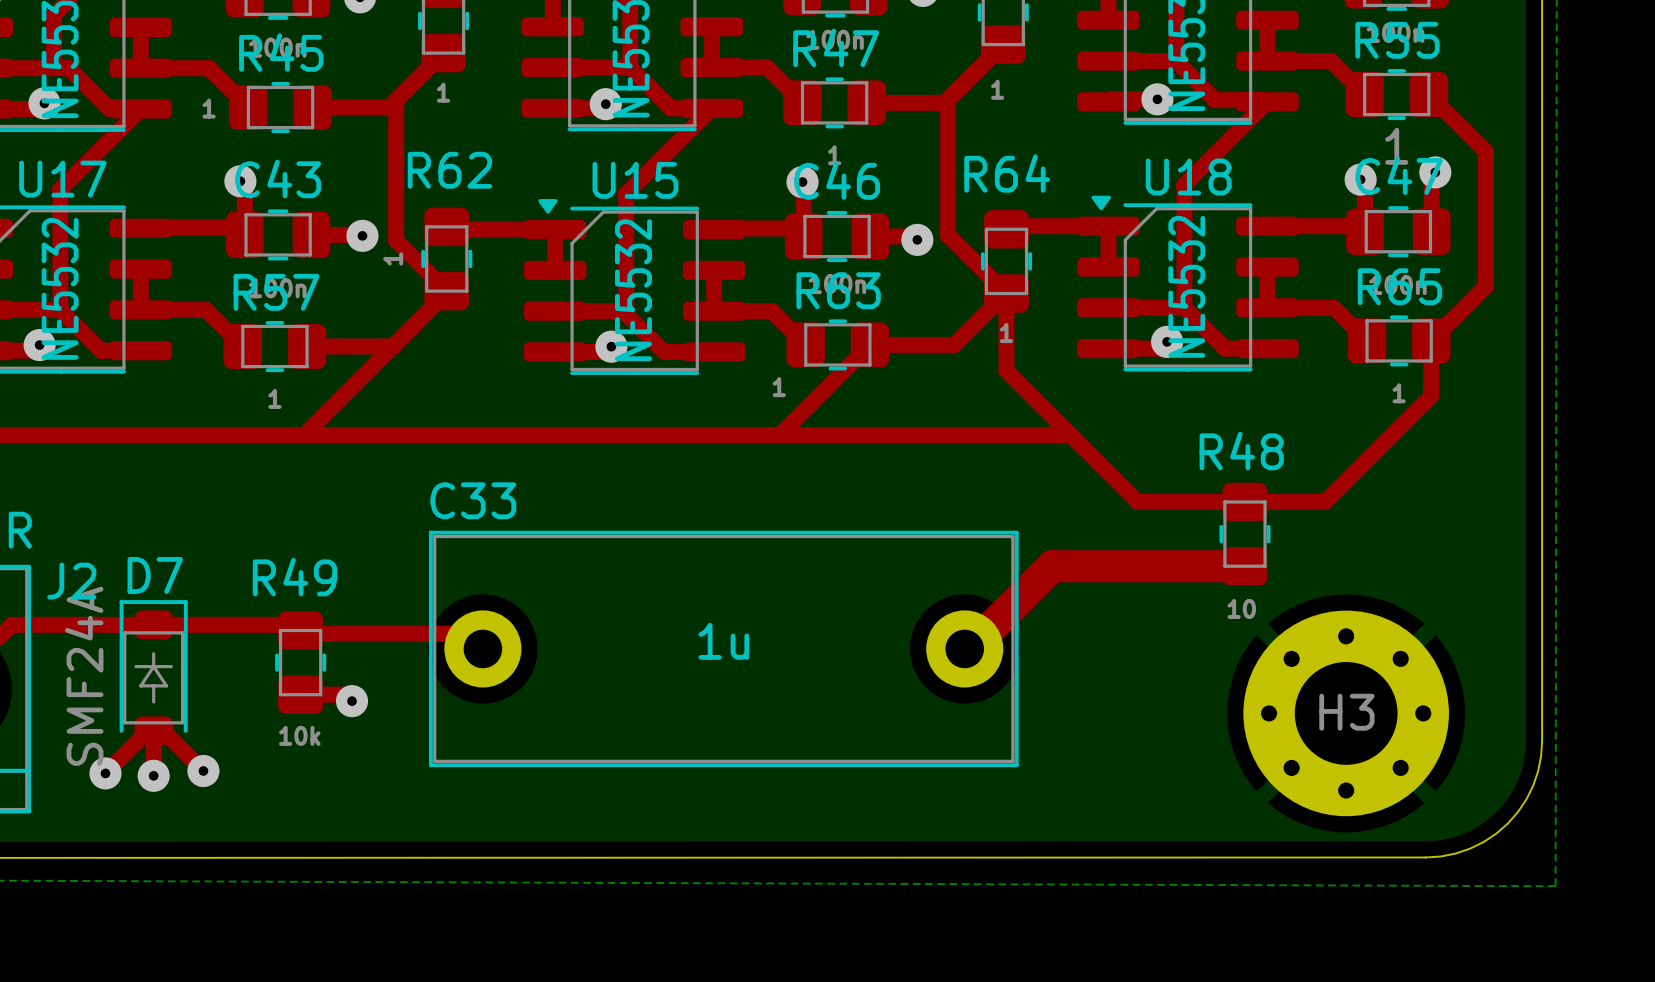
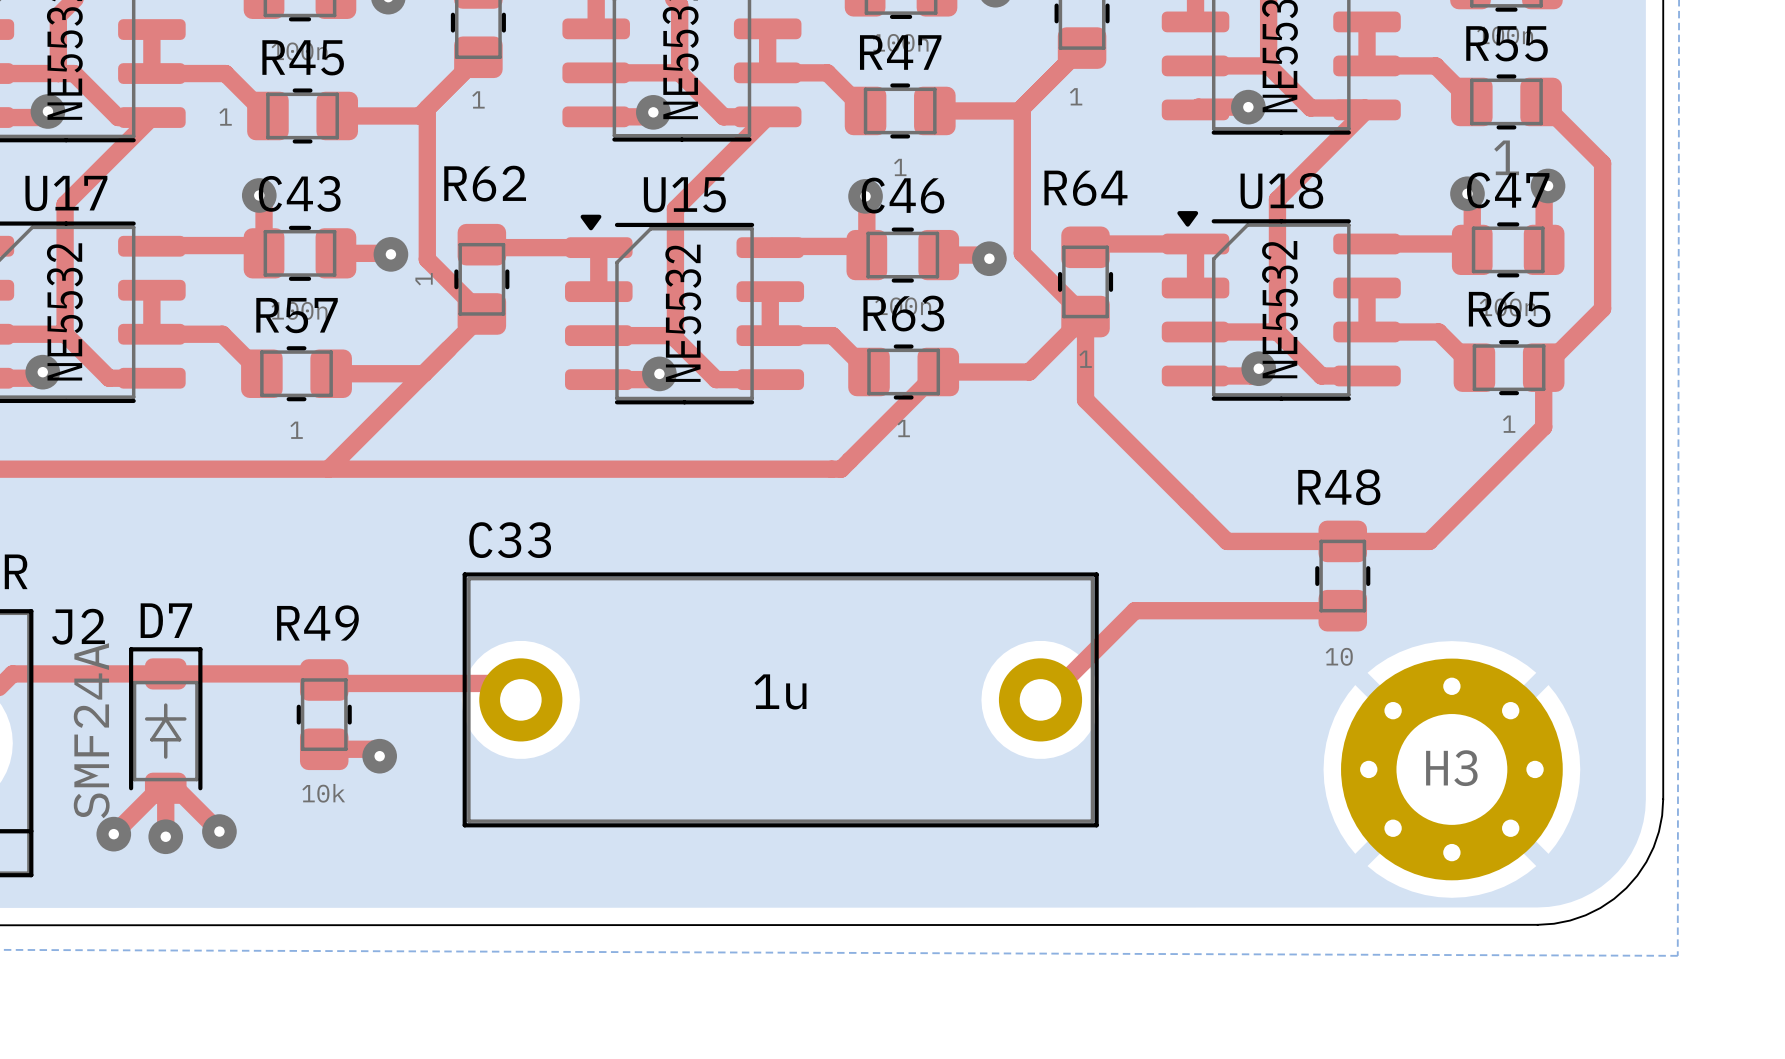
R63 value position: 1 (779, 387) -> 1 (903, 428)
top track: (779, 435) (1070, 435) -> none
top track width: thick (1244, 566) (1052, 566) (969, 648) -> thin (1342, 610) (1134, 610) (1045, 699)

